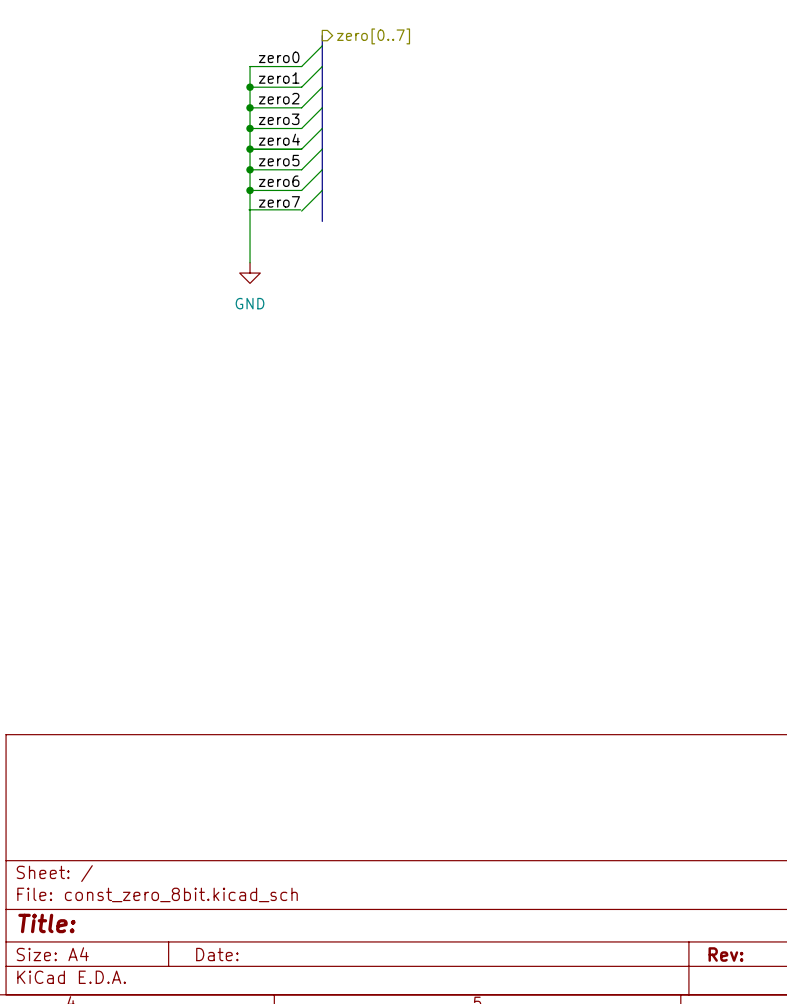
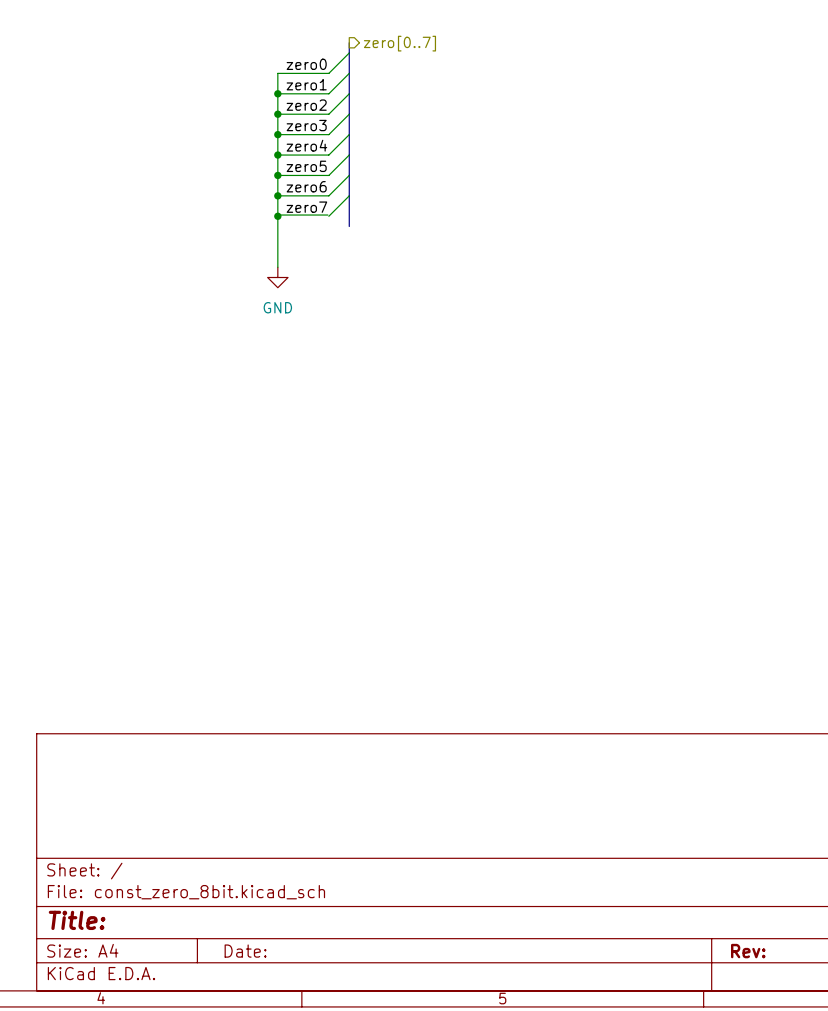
wire: (249, 149) (301, 149) -> none
junction: none -> (277, 216)

